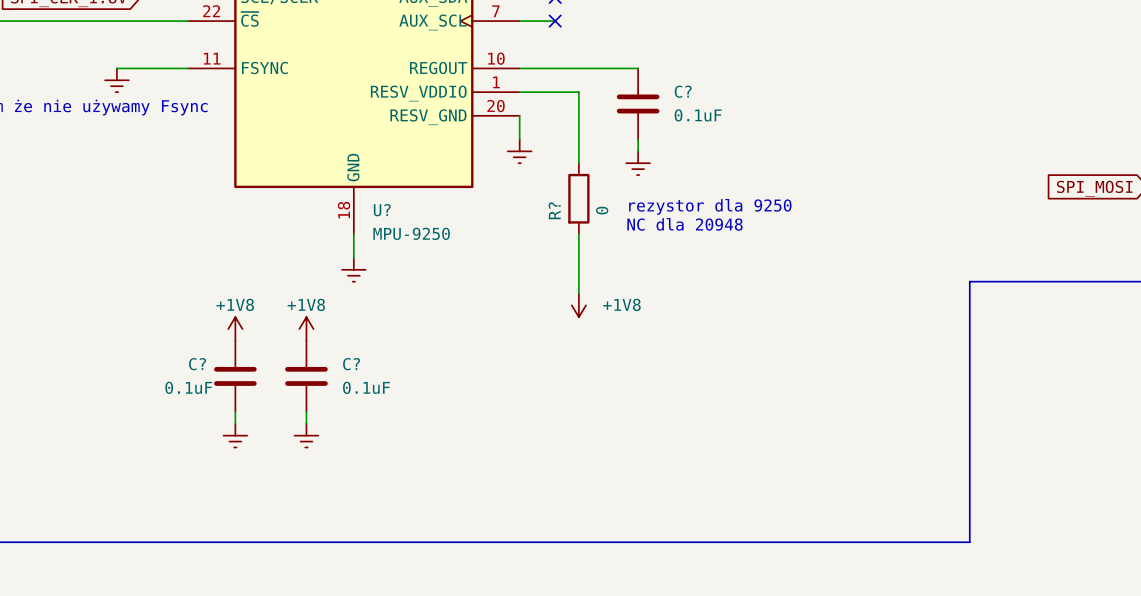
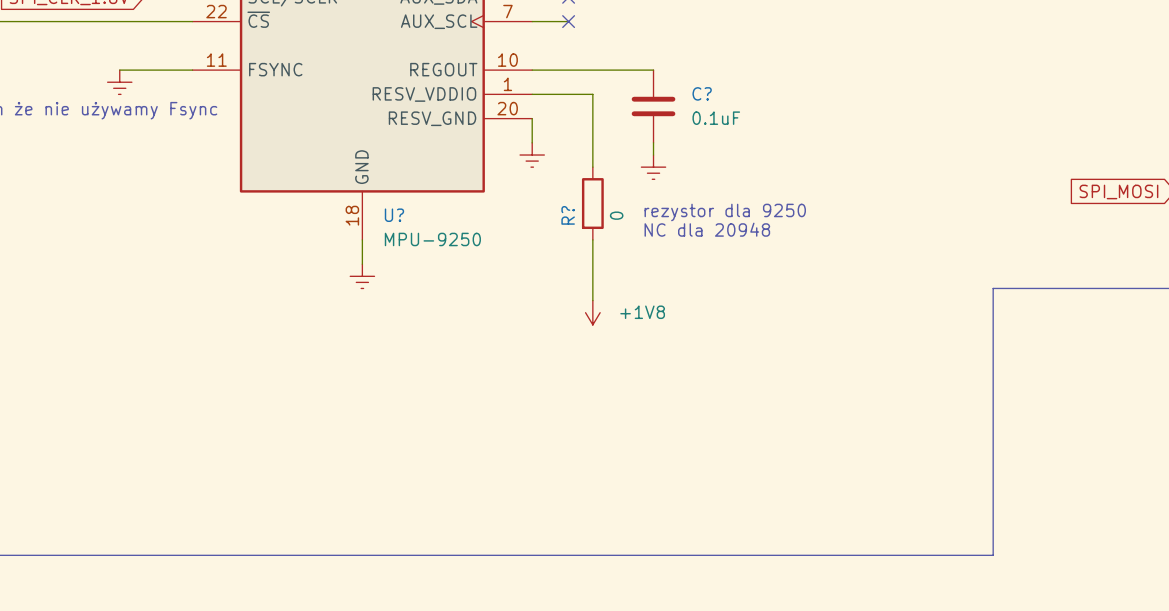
power symbol: +1V8 (235, 329) -> none
power symbol: +1V8 (306, 329) -> none
C?: 0.1uF (235, 376) -> none
C?: 0.1uF (306, 376) -> none
wire: (235, 411) (235, 423) -> none
wire: (306, 411) (306, 423) -> none
power symbol: (235, 435) -> none
power symbol: (306, 435) -> none

